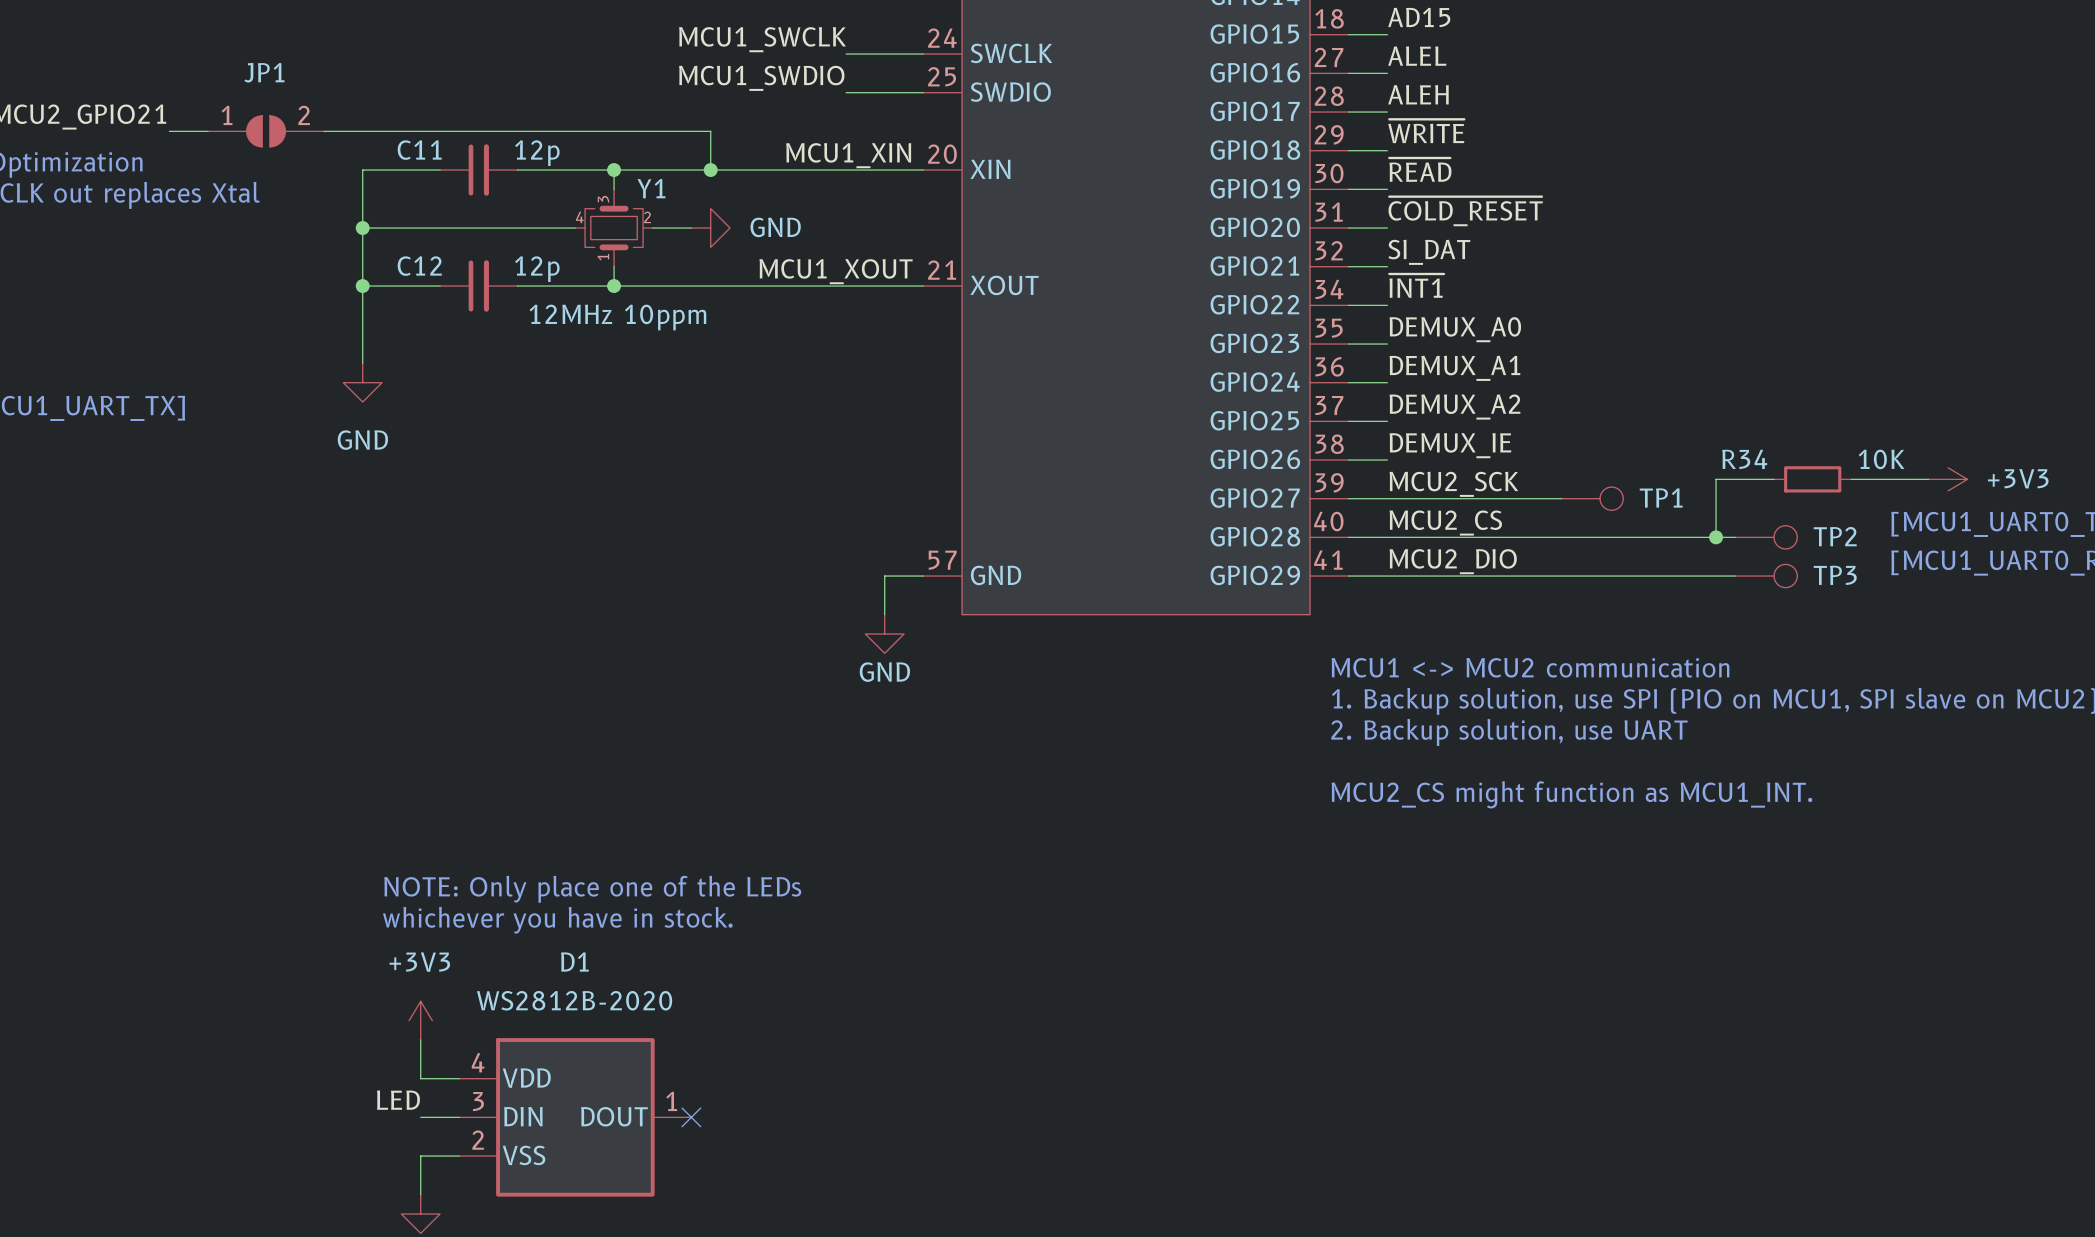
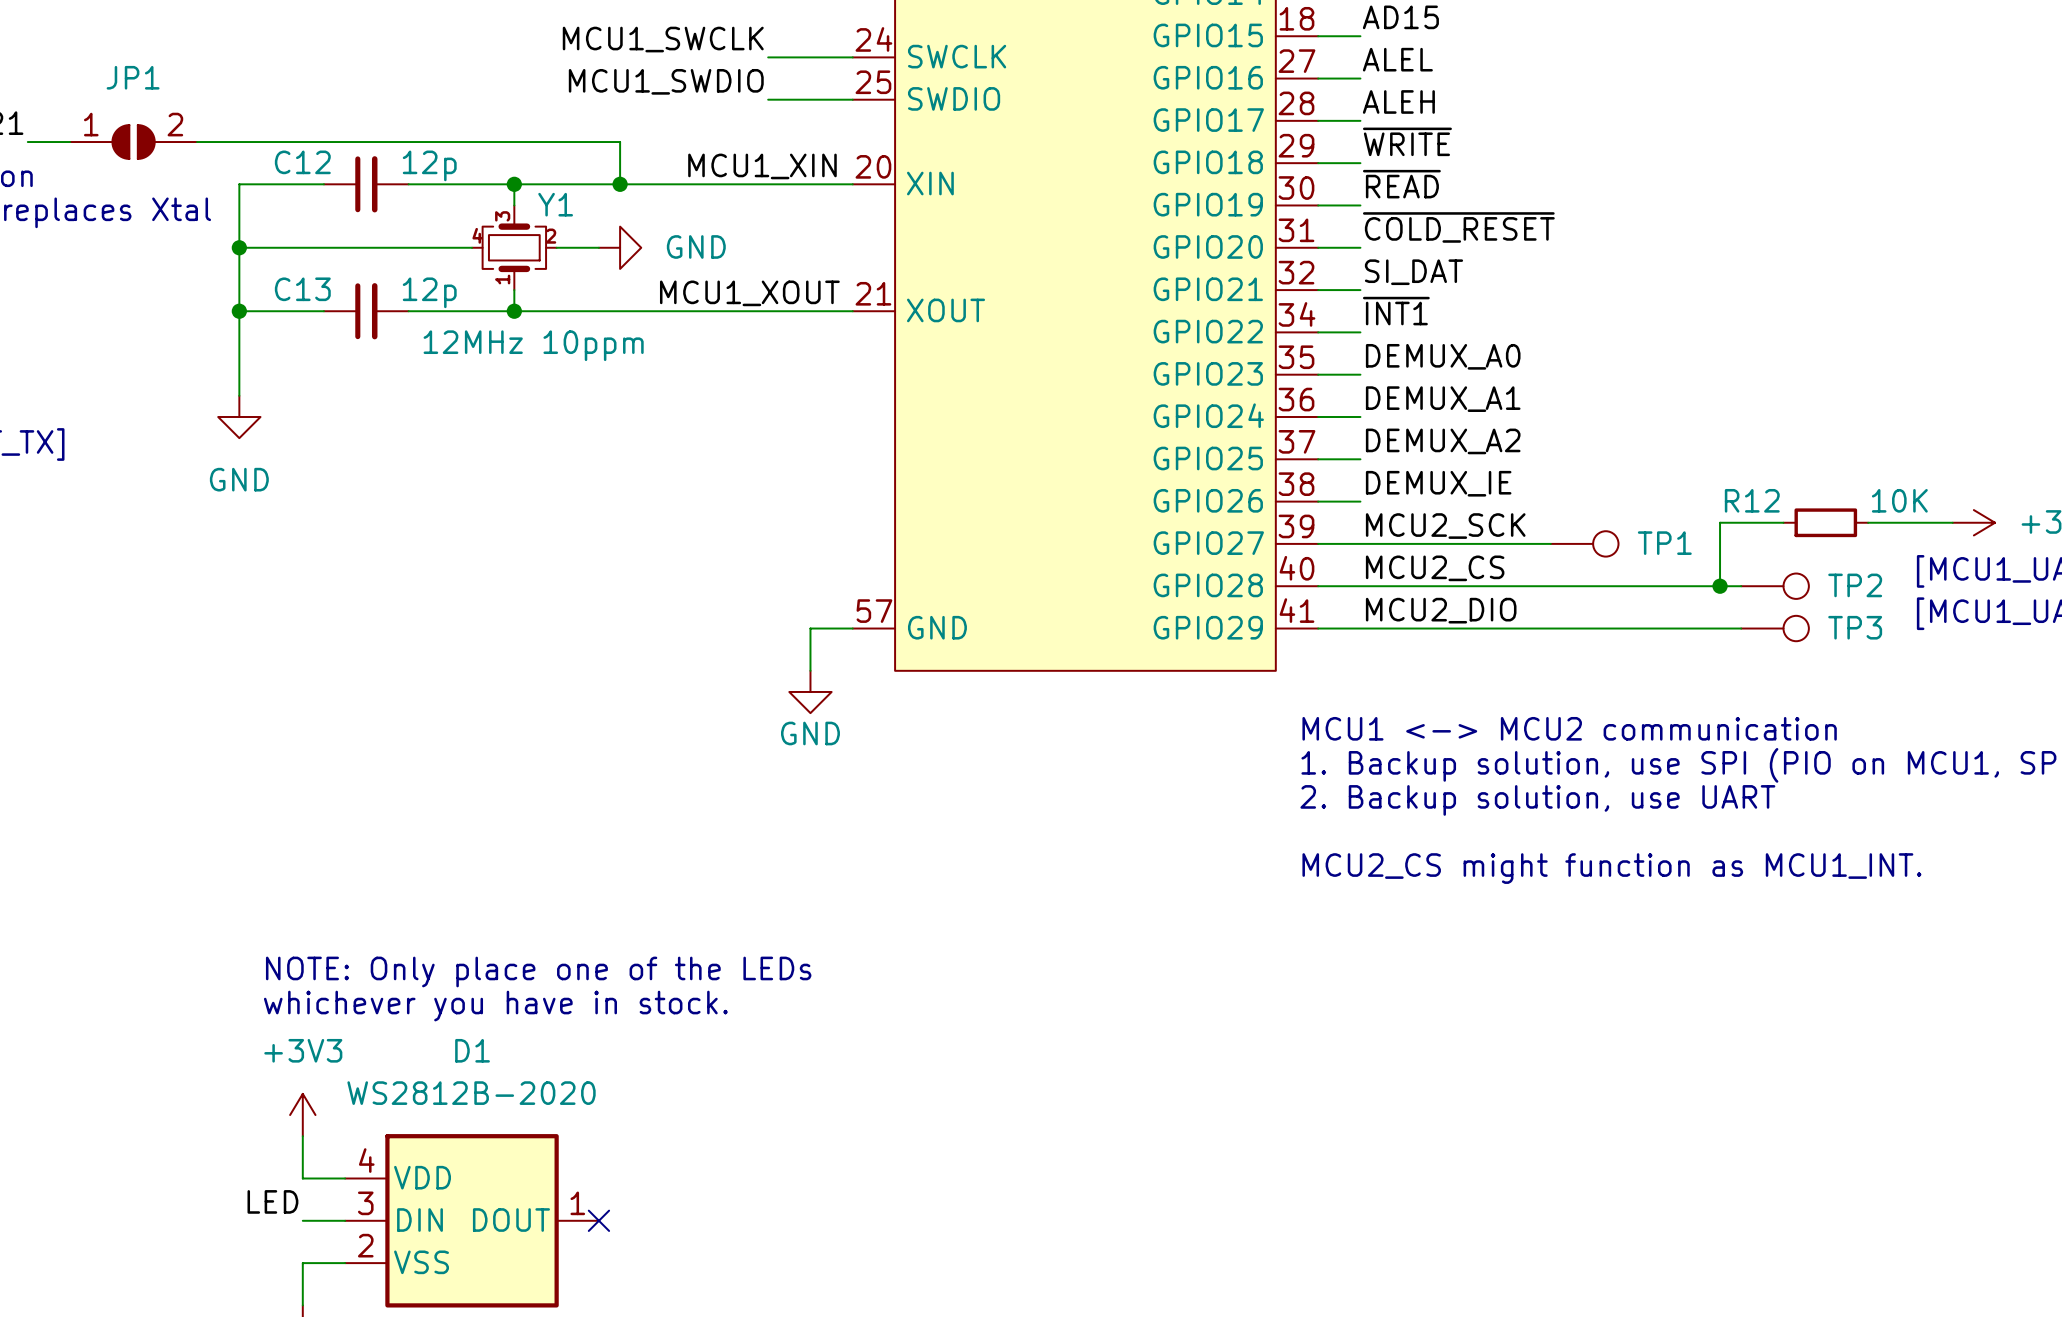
C11 name: C11 (419, 150) -> C12 (302, 162)
C12 name: C12 (419, 266) -> C13 (302, 289)
R34 name: R34 (1744, 459) -> R12 (1752, 500)

